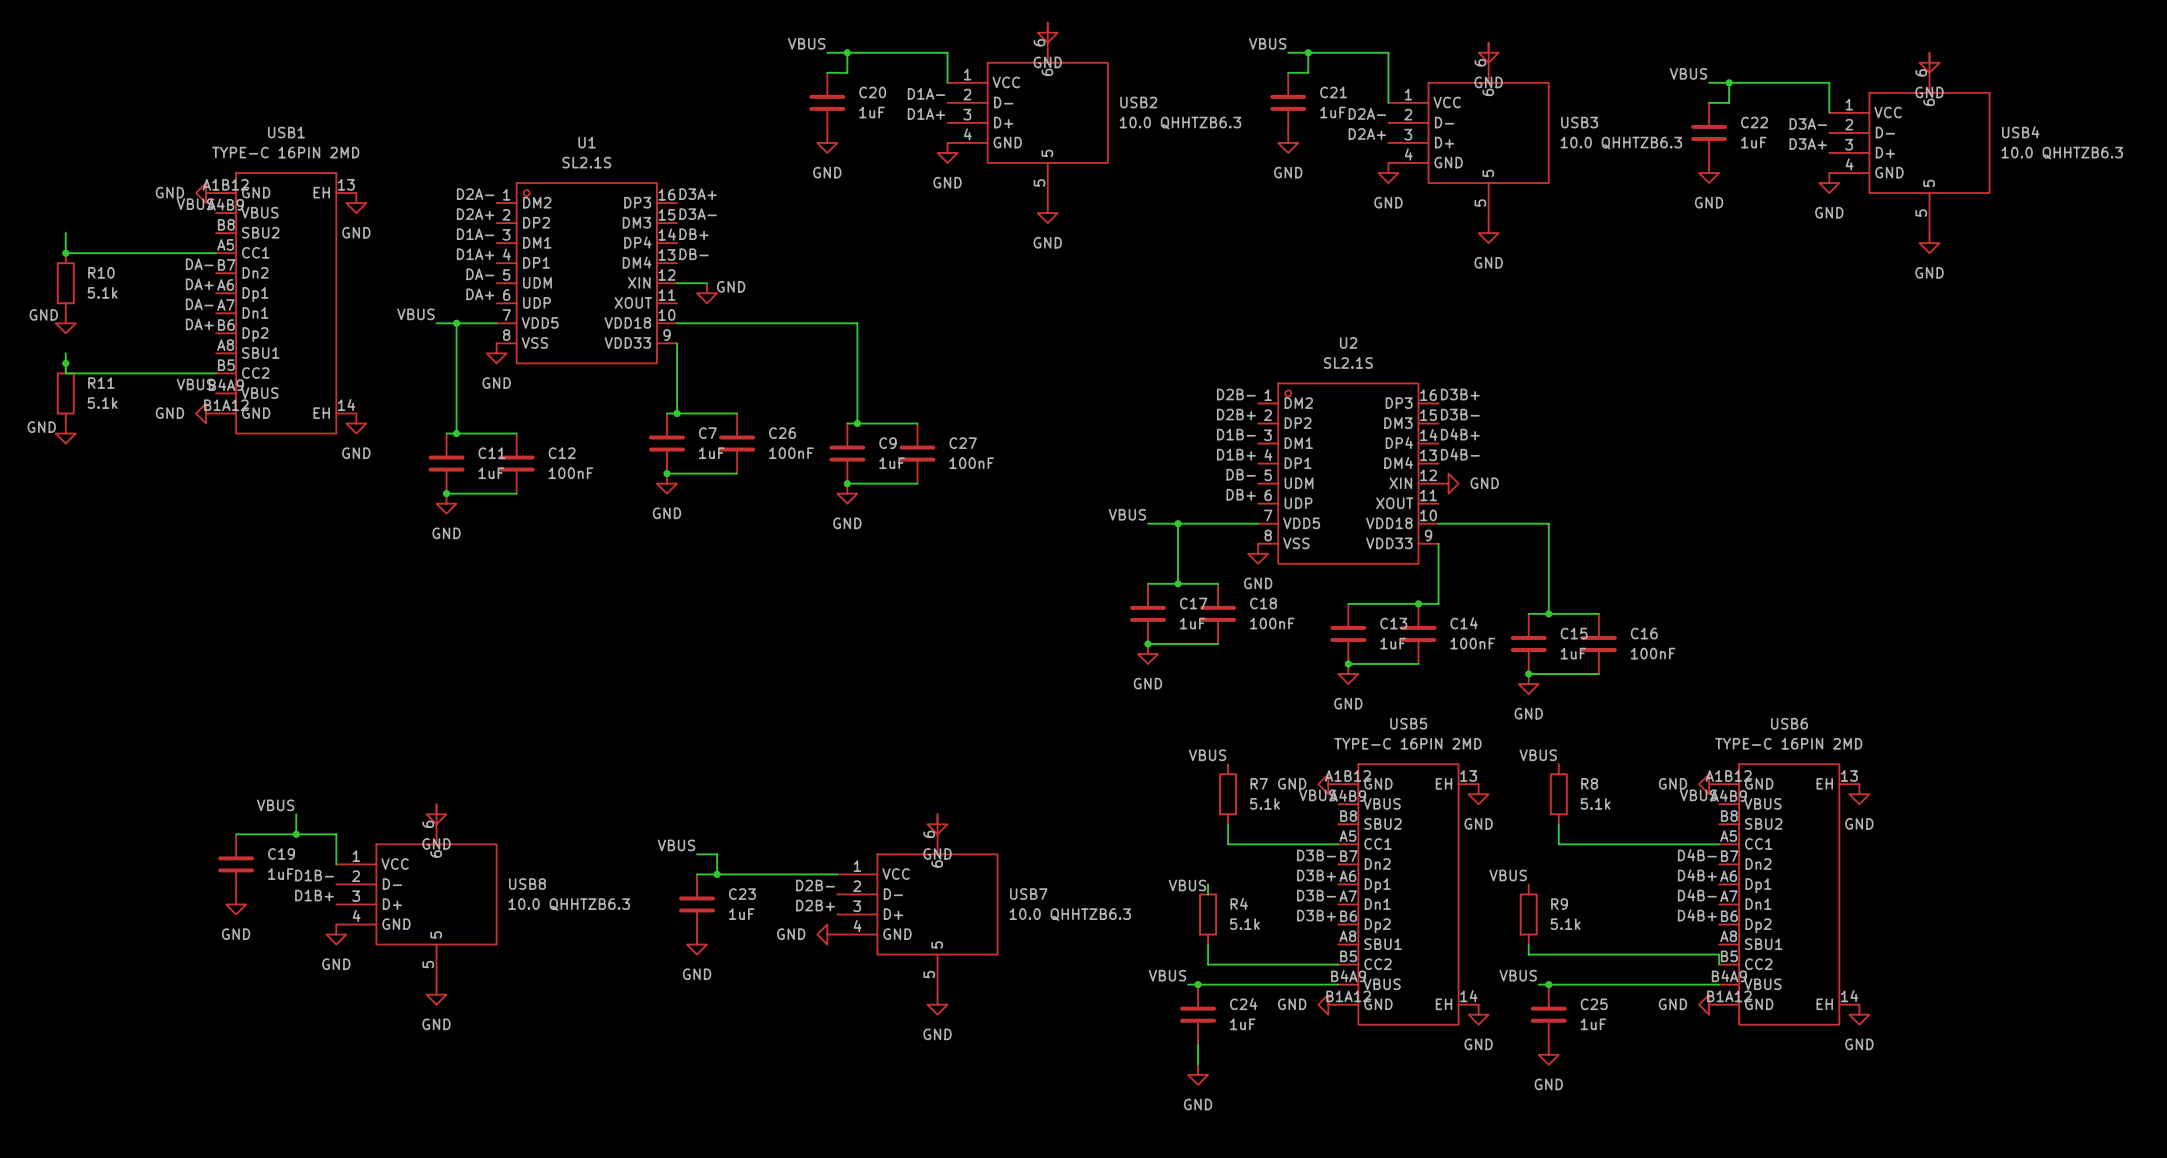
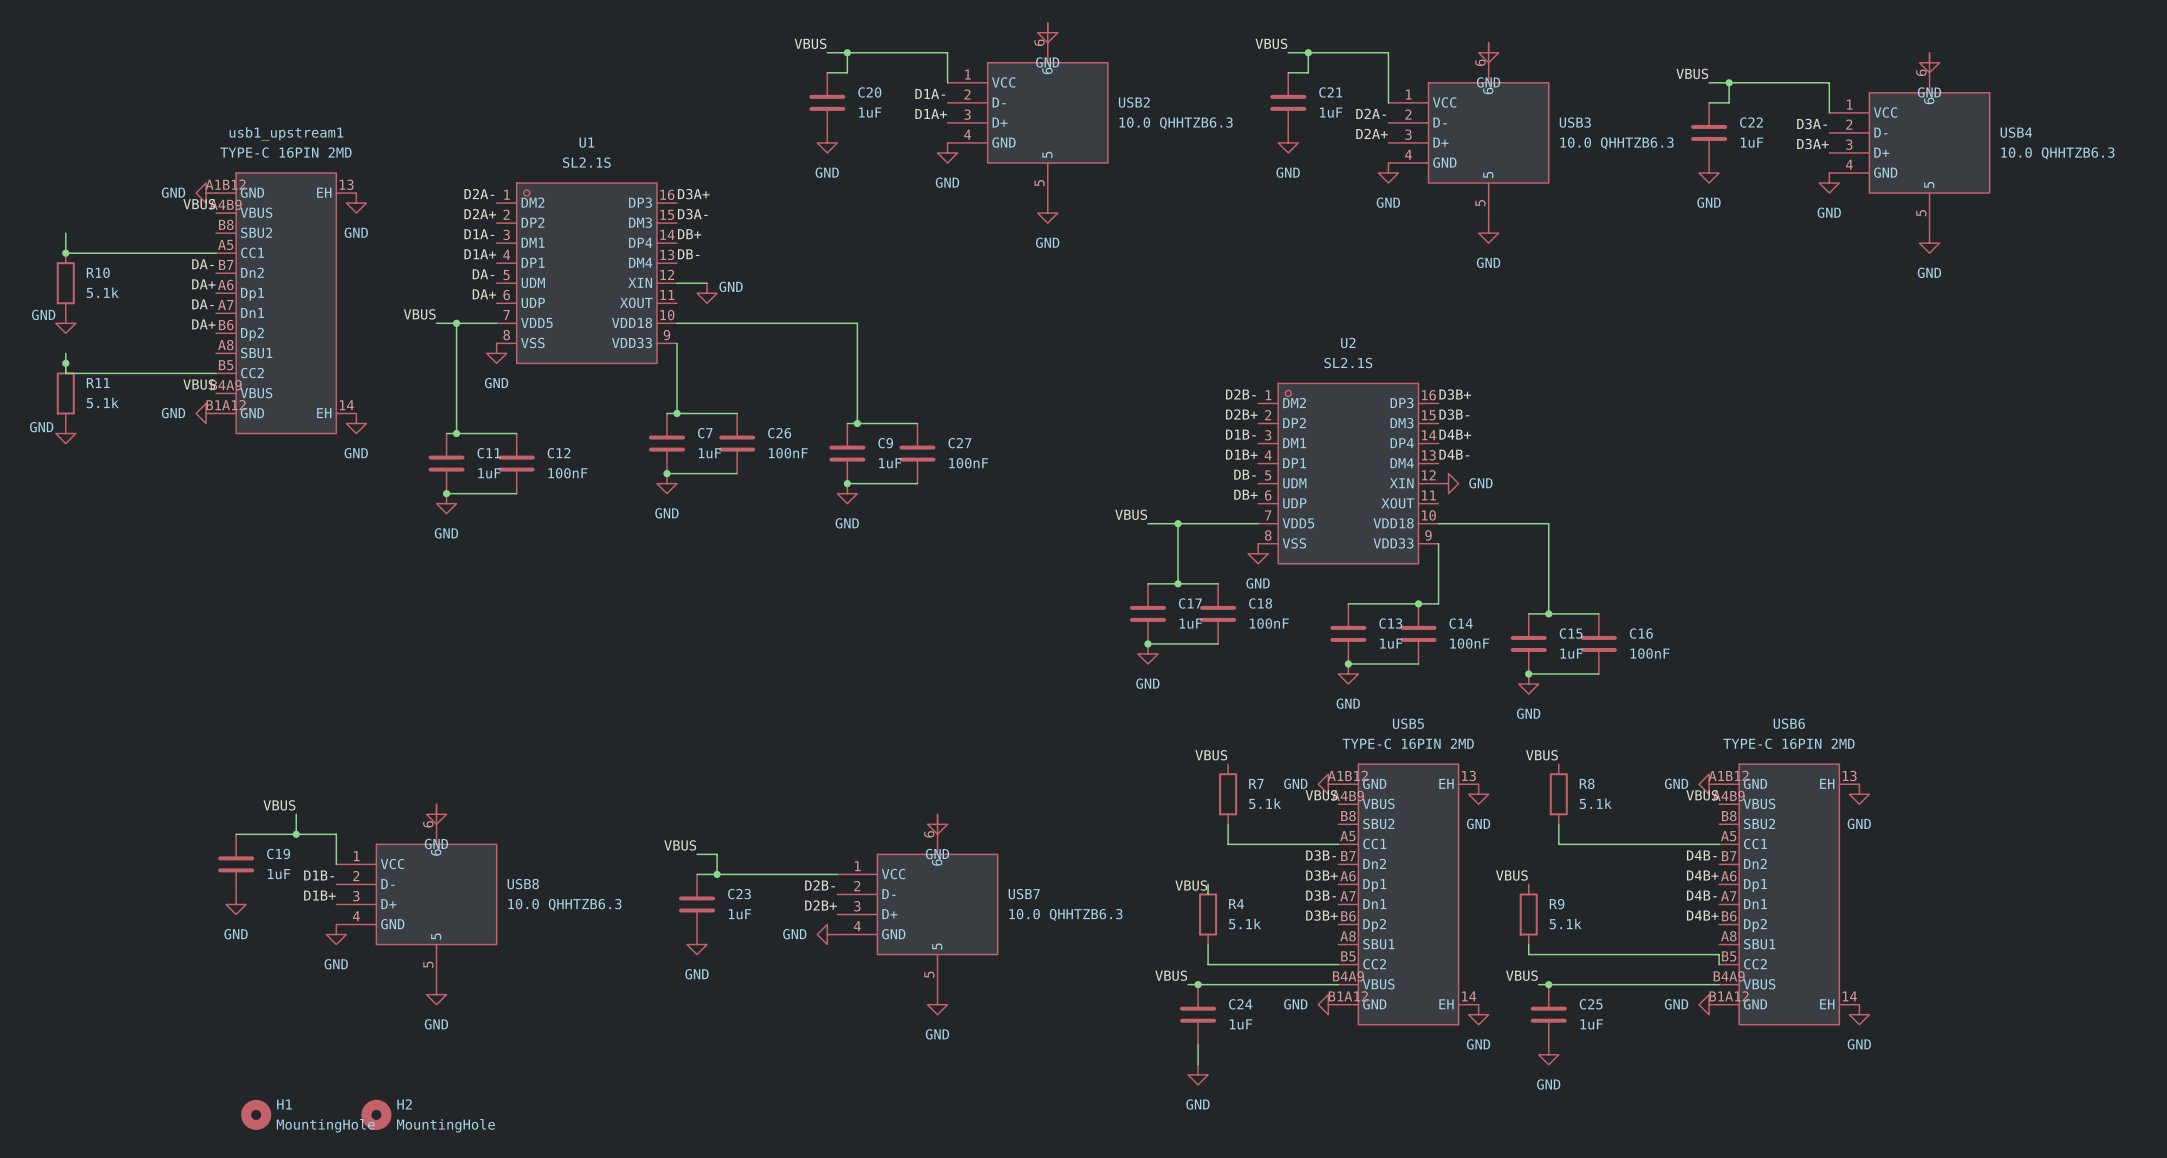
USB1 name: USB1 (286, 132) -> usb1_upstream1 (286, 133)
H1: none -> MountingHole (256, 1114)
H2: none -> MountingHole (376, 1114)

